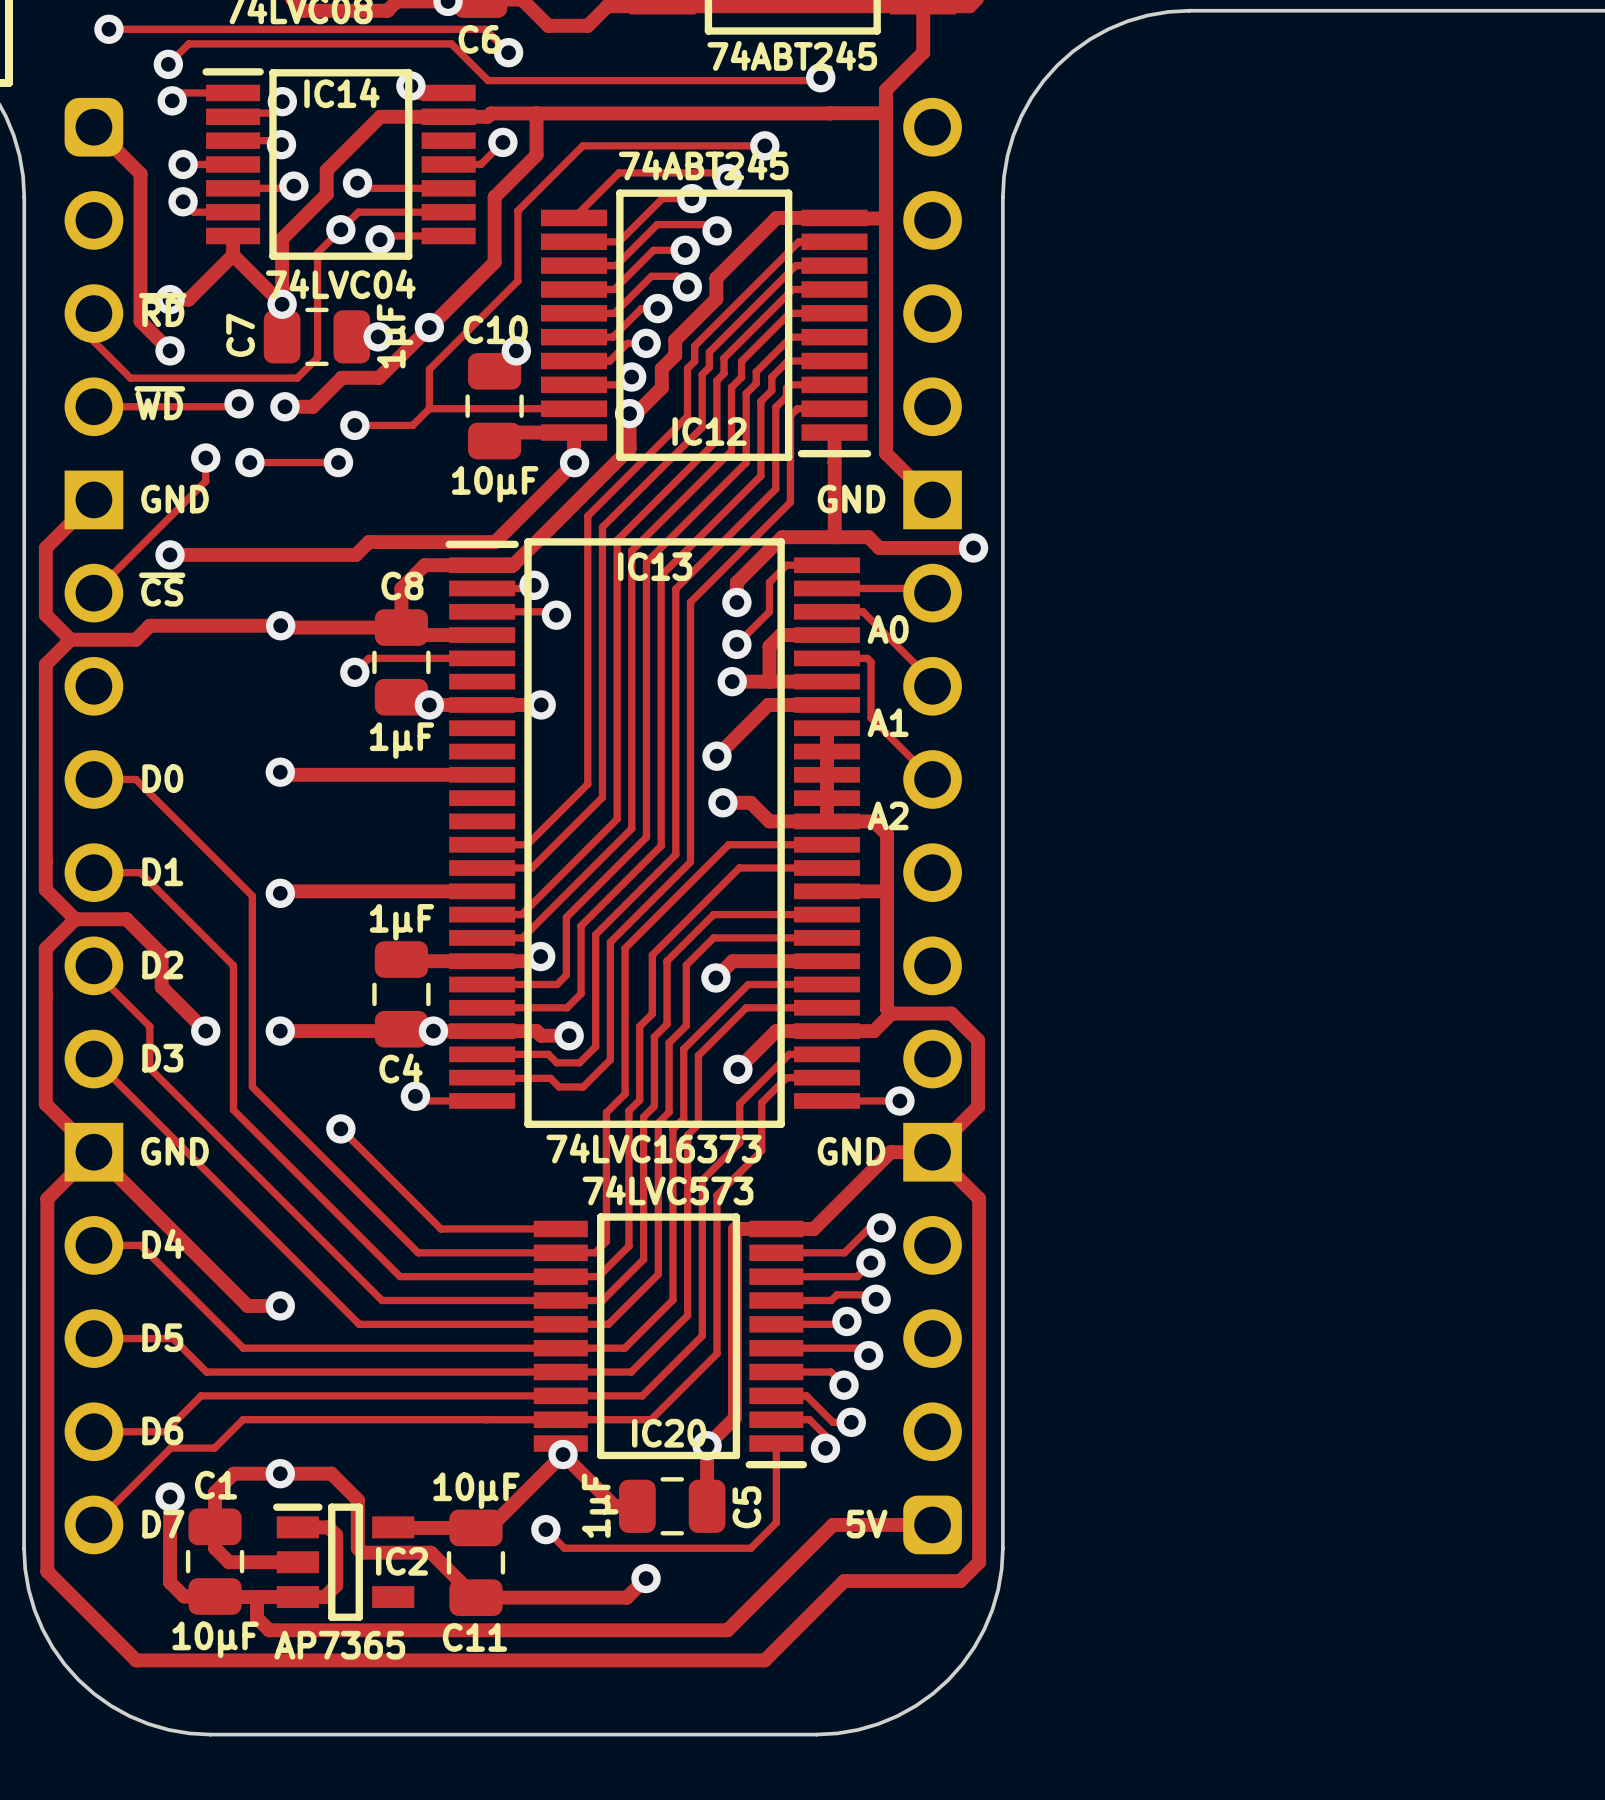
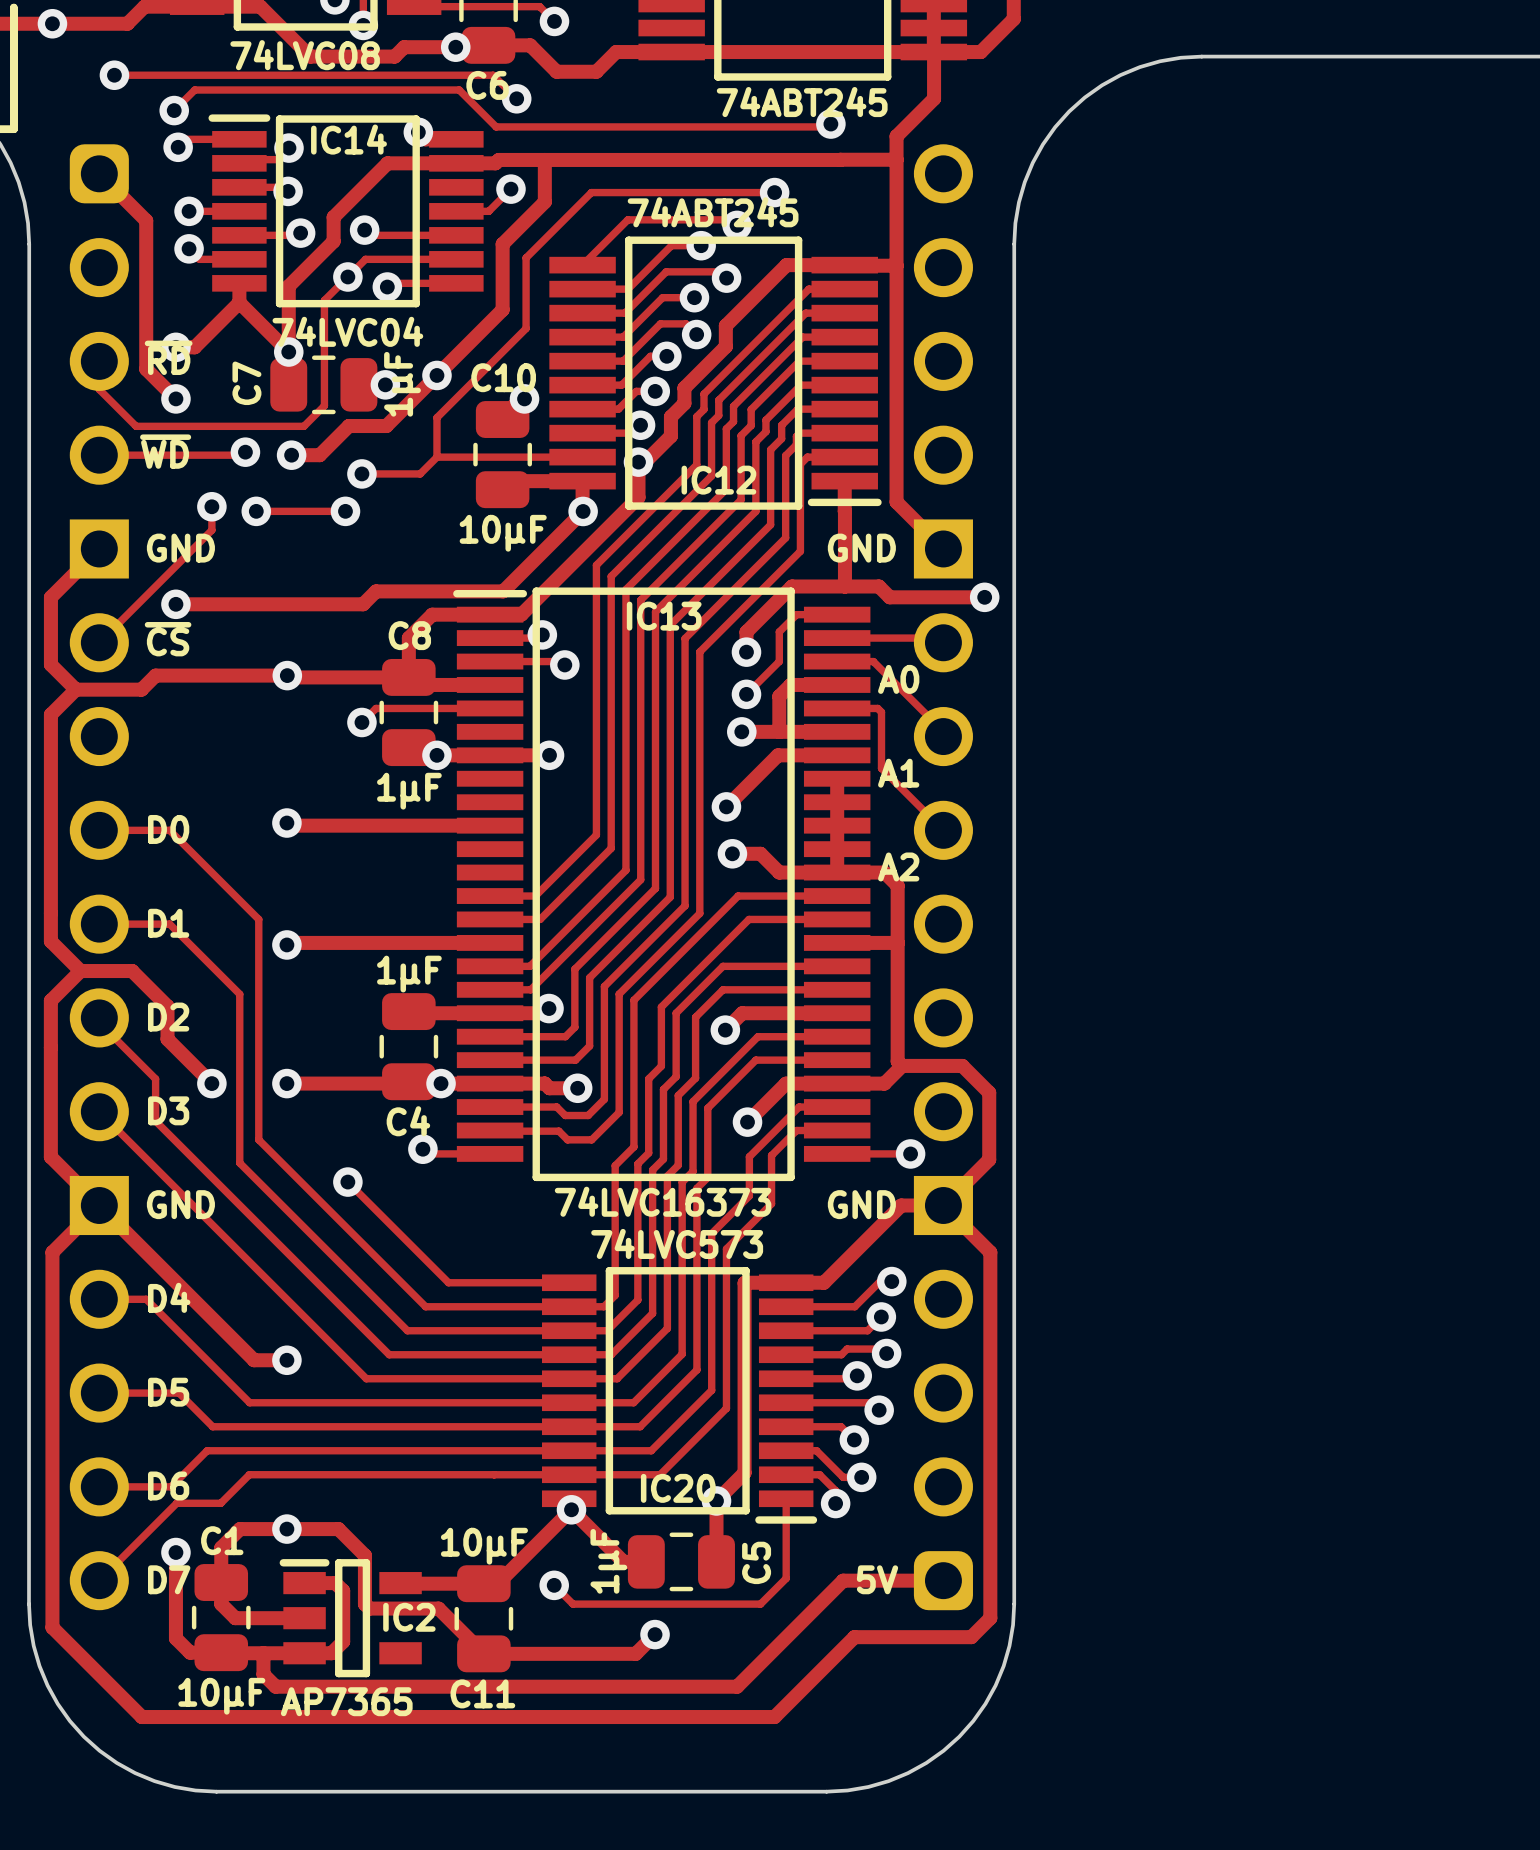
track: (135, 779) (252, 895) -> (141, 830) (169, 830) (258, 919) (258, 947)
track: (140, 872) (233, 965) -> (146, 924) (169, 924) (239, 994) (239, 1017)

